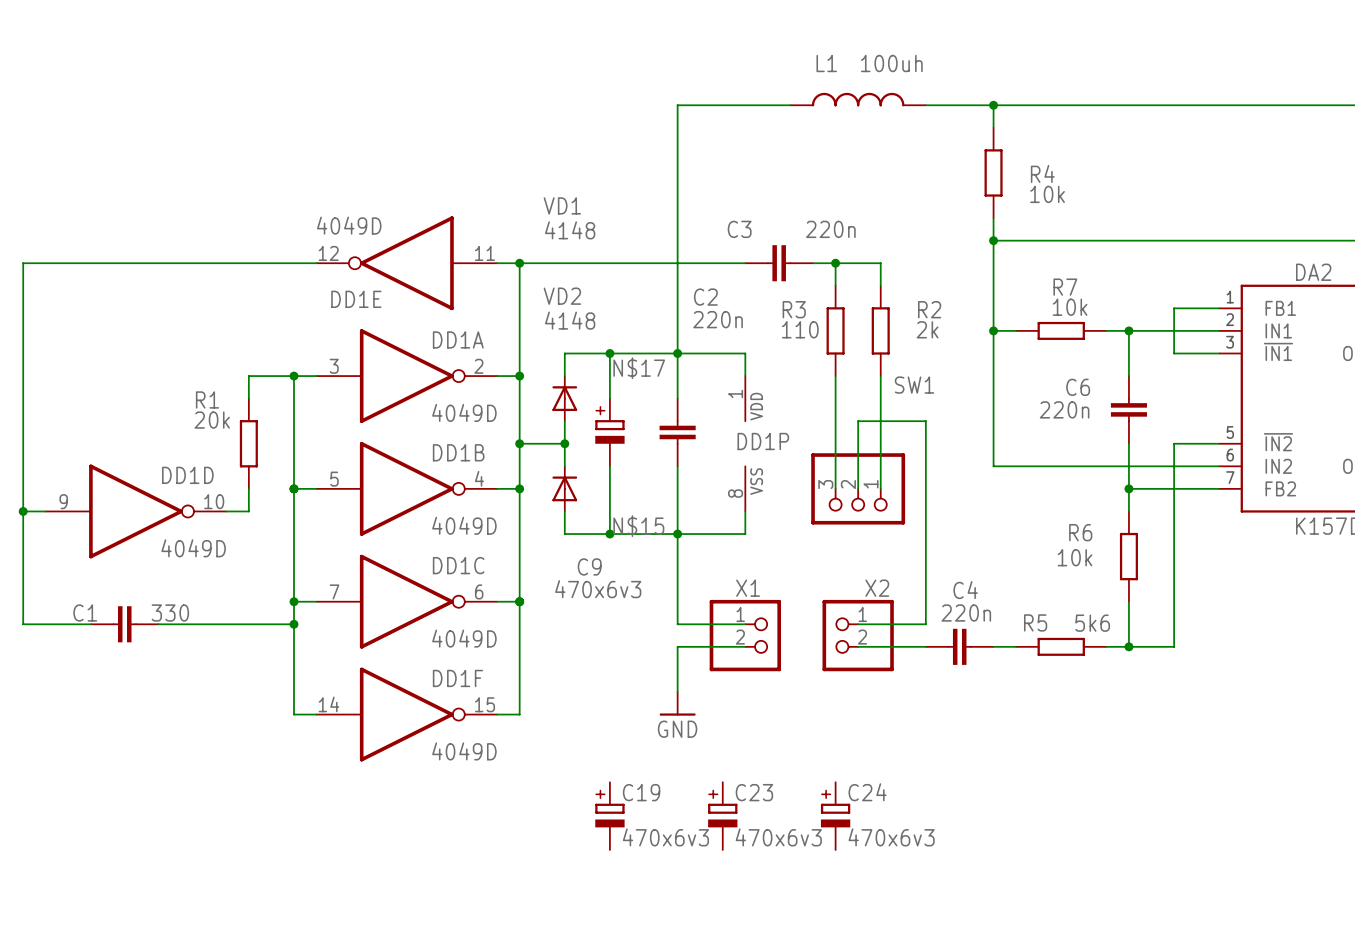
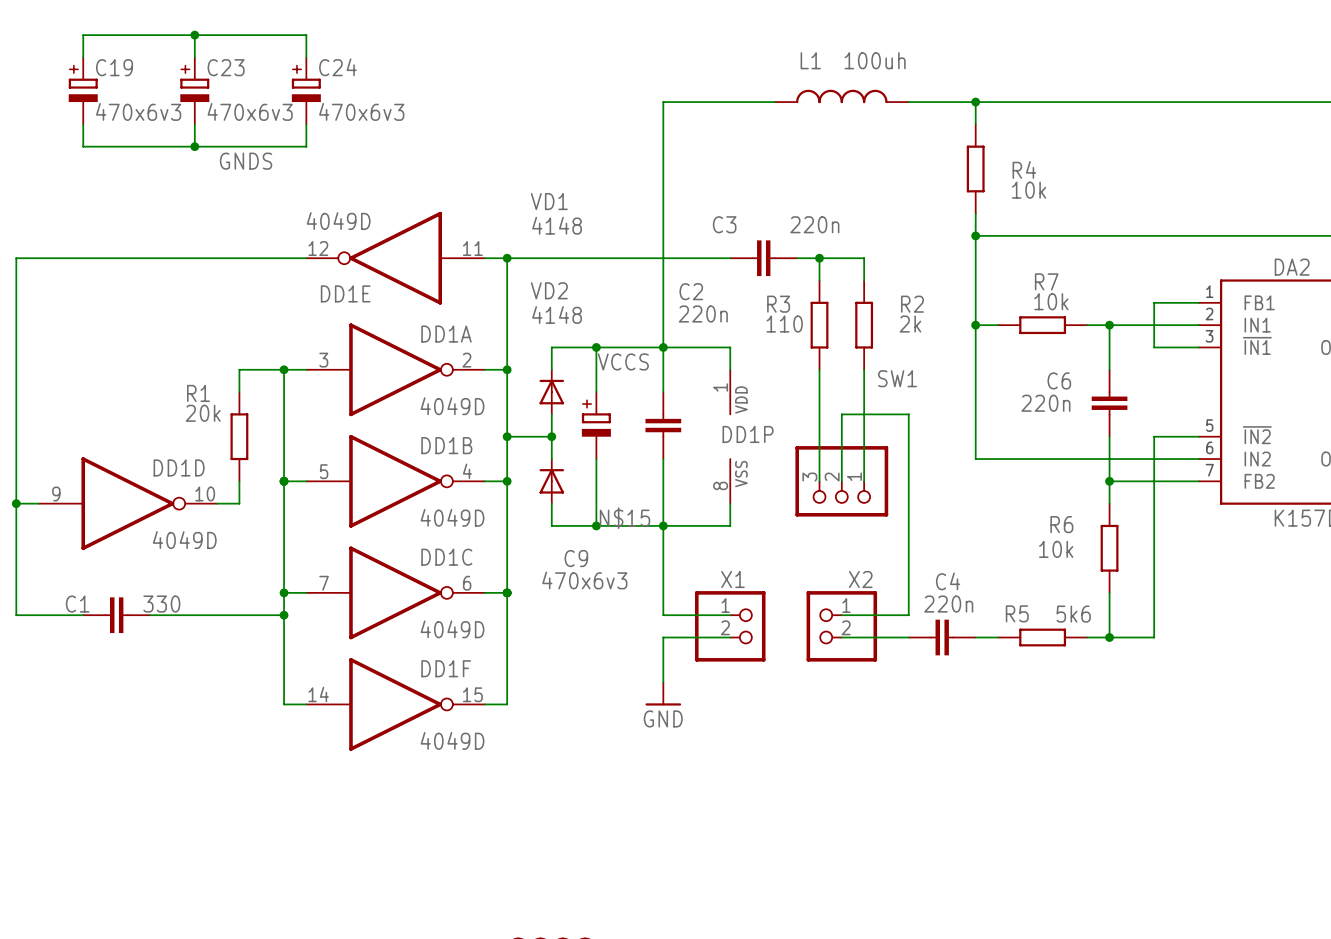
wire: none -> (194, 35) (194, 57)
junction: none -> (194, 35)
wire: none -> (83, 57) (83, 35) (306, 35) (306, 57)
wire: none -> (83, 124) (83, 146) (306, 146) (306, 124)
wire: none -> (194, 124) (194, 146)
junction: none -> (194, 146)
label: none -> GNDS (246, 161)
label: N$17 (639, 368) -> VCCS (623, 361)
C19 position: (609, 816) -> (83, 90)
C23 position: (722, 816) -> (194, 90)
C24 position: (835, 816) -> (306, 90)

